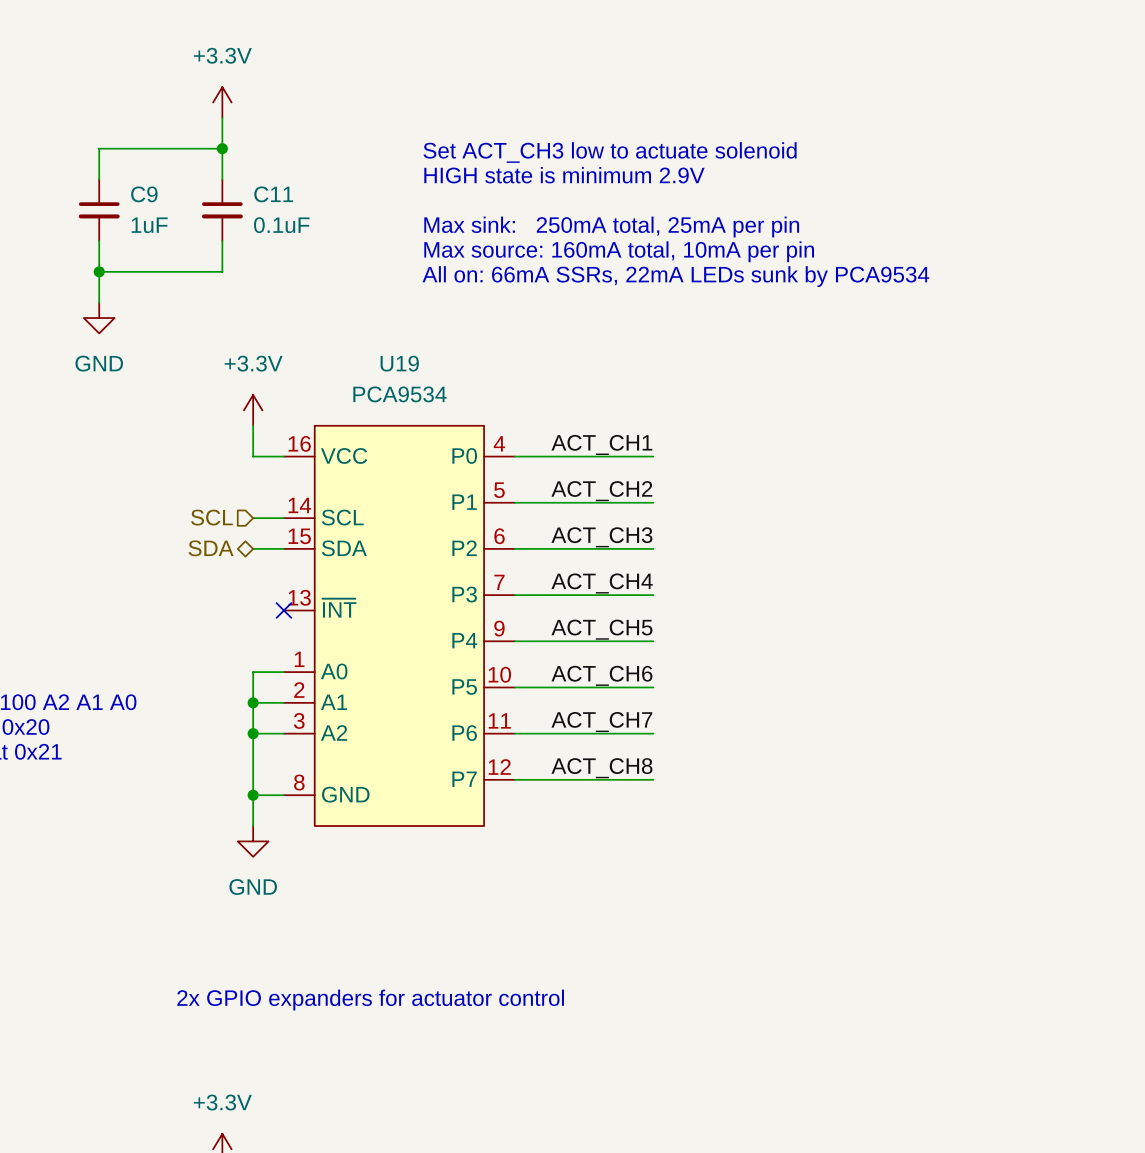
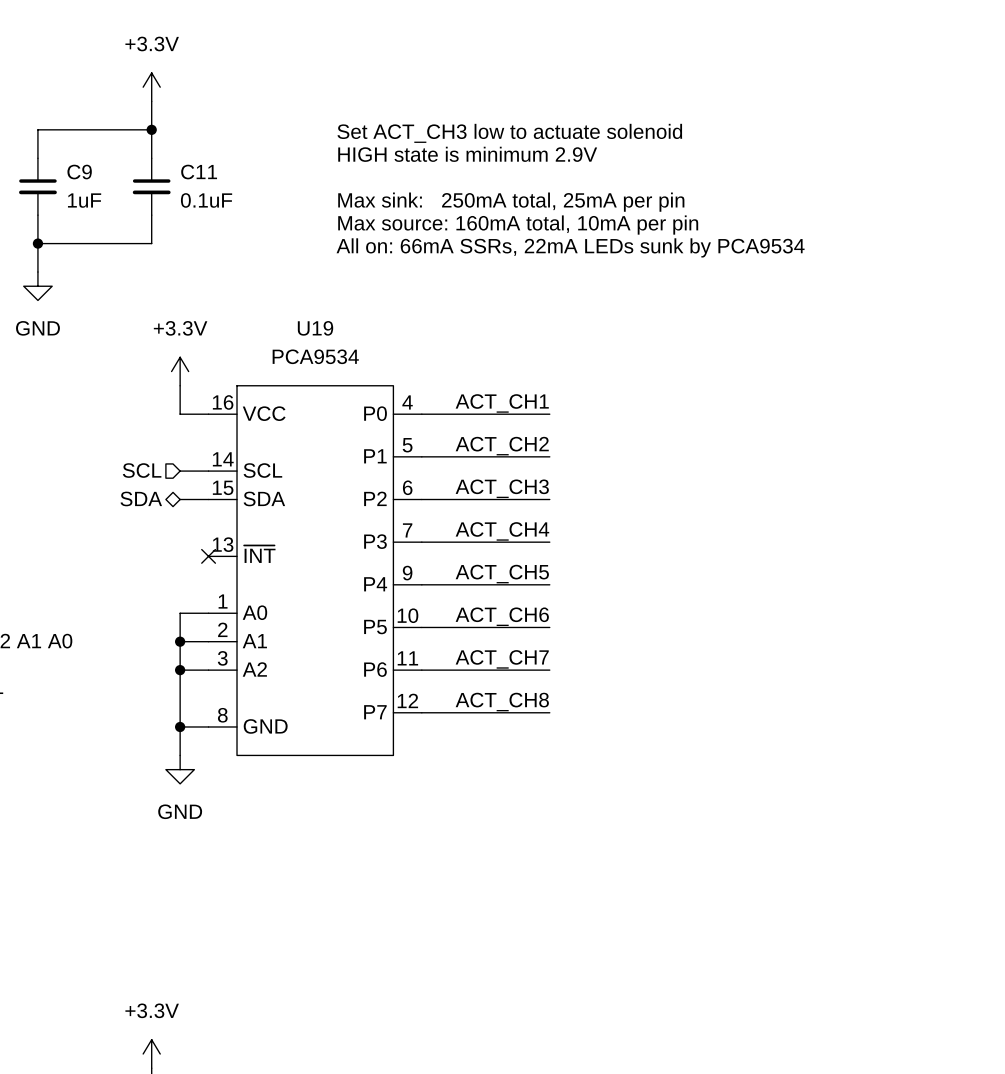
text: 2x GPIO expanders for actuator control (370, 1000) -> none

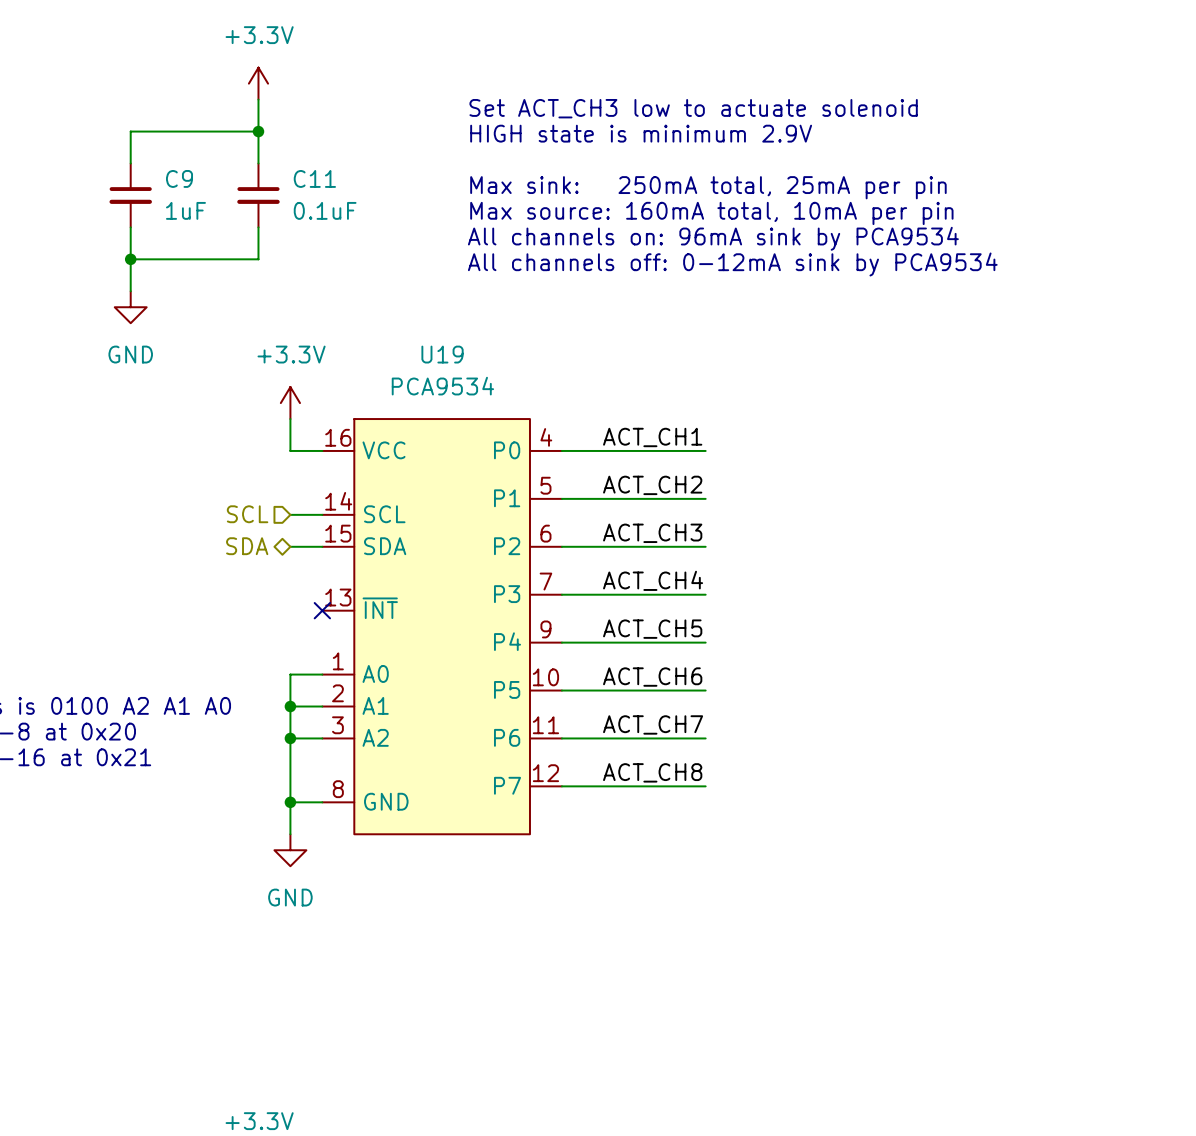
text: none -> Set ACT_CH3 low to actuate solenoid (693, 108)
text: Set ACT_CH3 low to actuate solenoid (509, 133) -> HIGH state is minimum 2.9V (641, 133)
text: HIGH state is minimum 2.9V (467, 154) -> none
text: none -> Max sink: 250mA total, 25mA per pin (708, 187)
text: Max sink: 250mA total, 25mA per pin (511, 202) -> Max source: 160mA total, 10mA per pin (711, 213)
text: Max source: 160mA total, 10mA per pin (518, 225) -> All channels on: 96mA sink by PCA9534 (713, 238)
text: All on: 66mA SSRs, 22mA LEDs sunk by PCA9534 (570, 247) -> All channels off: 0-12mA sink by PCA9534 (732, 264)

